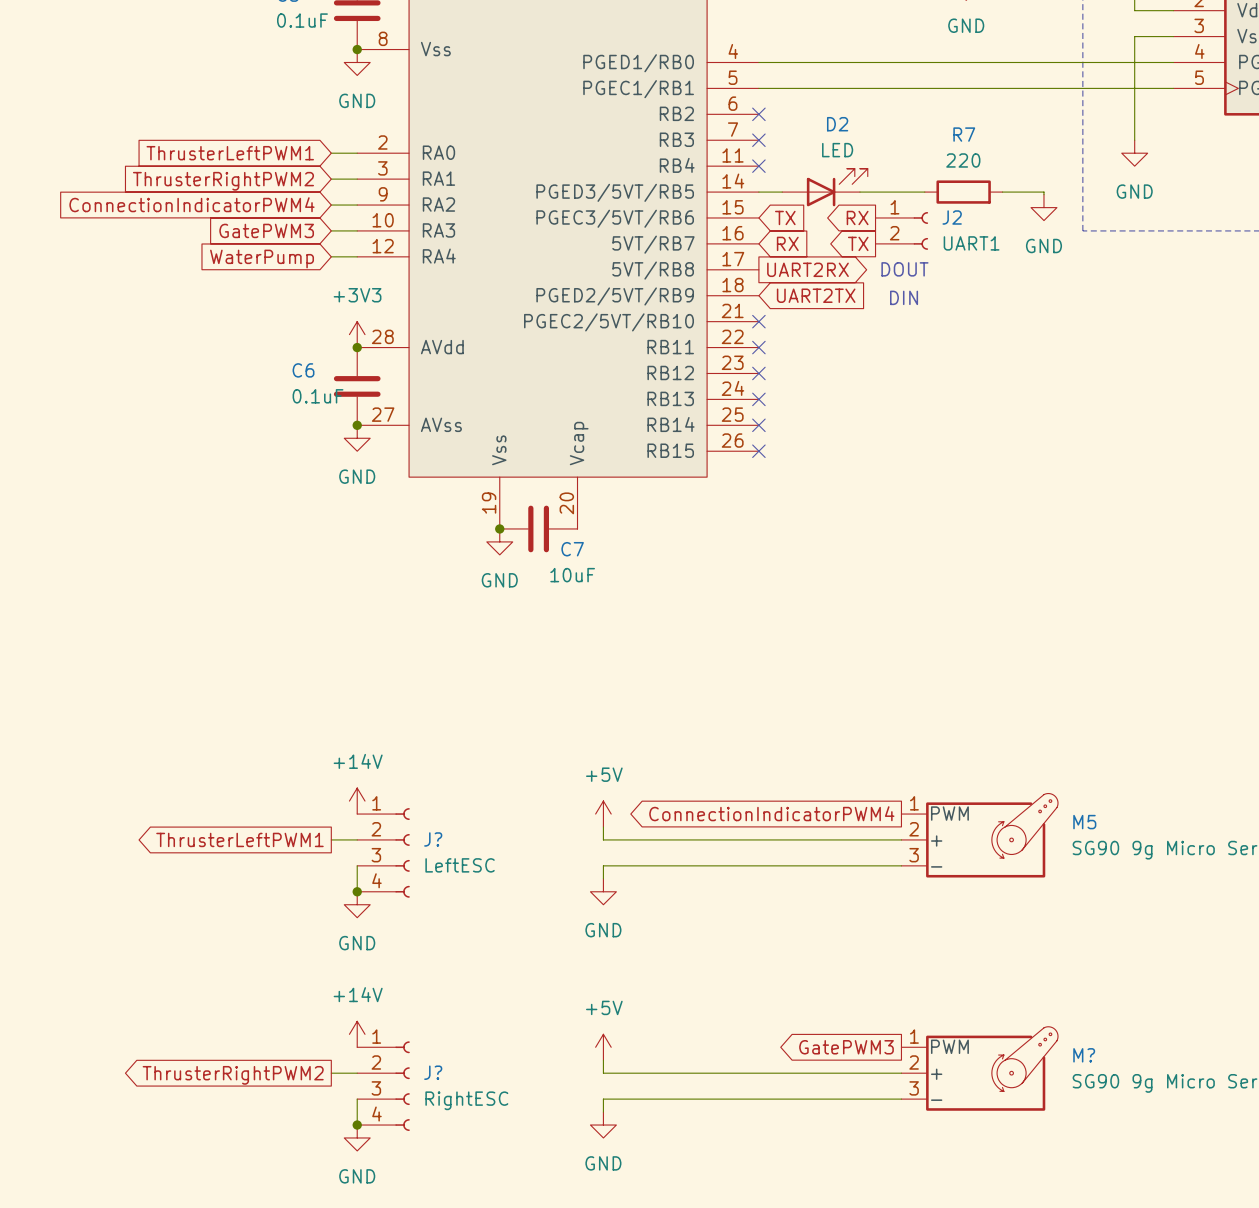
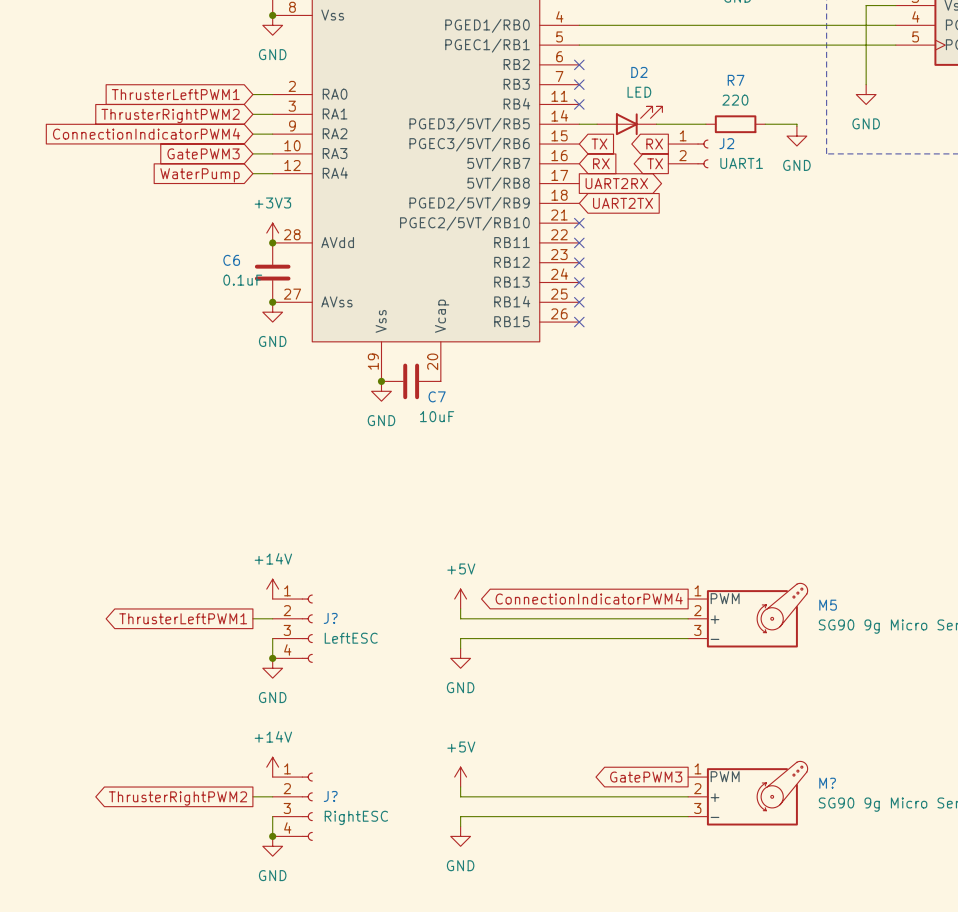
text: DOUT (904, 269) -> none
text: DIN (904, 297) -> none

